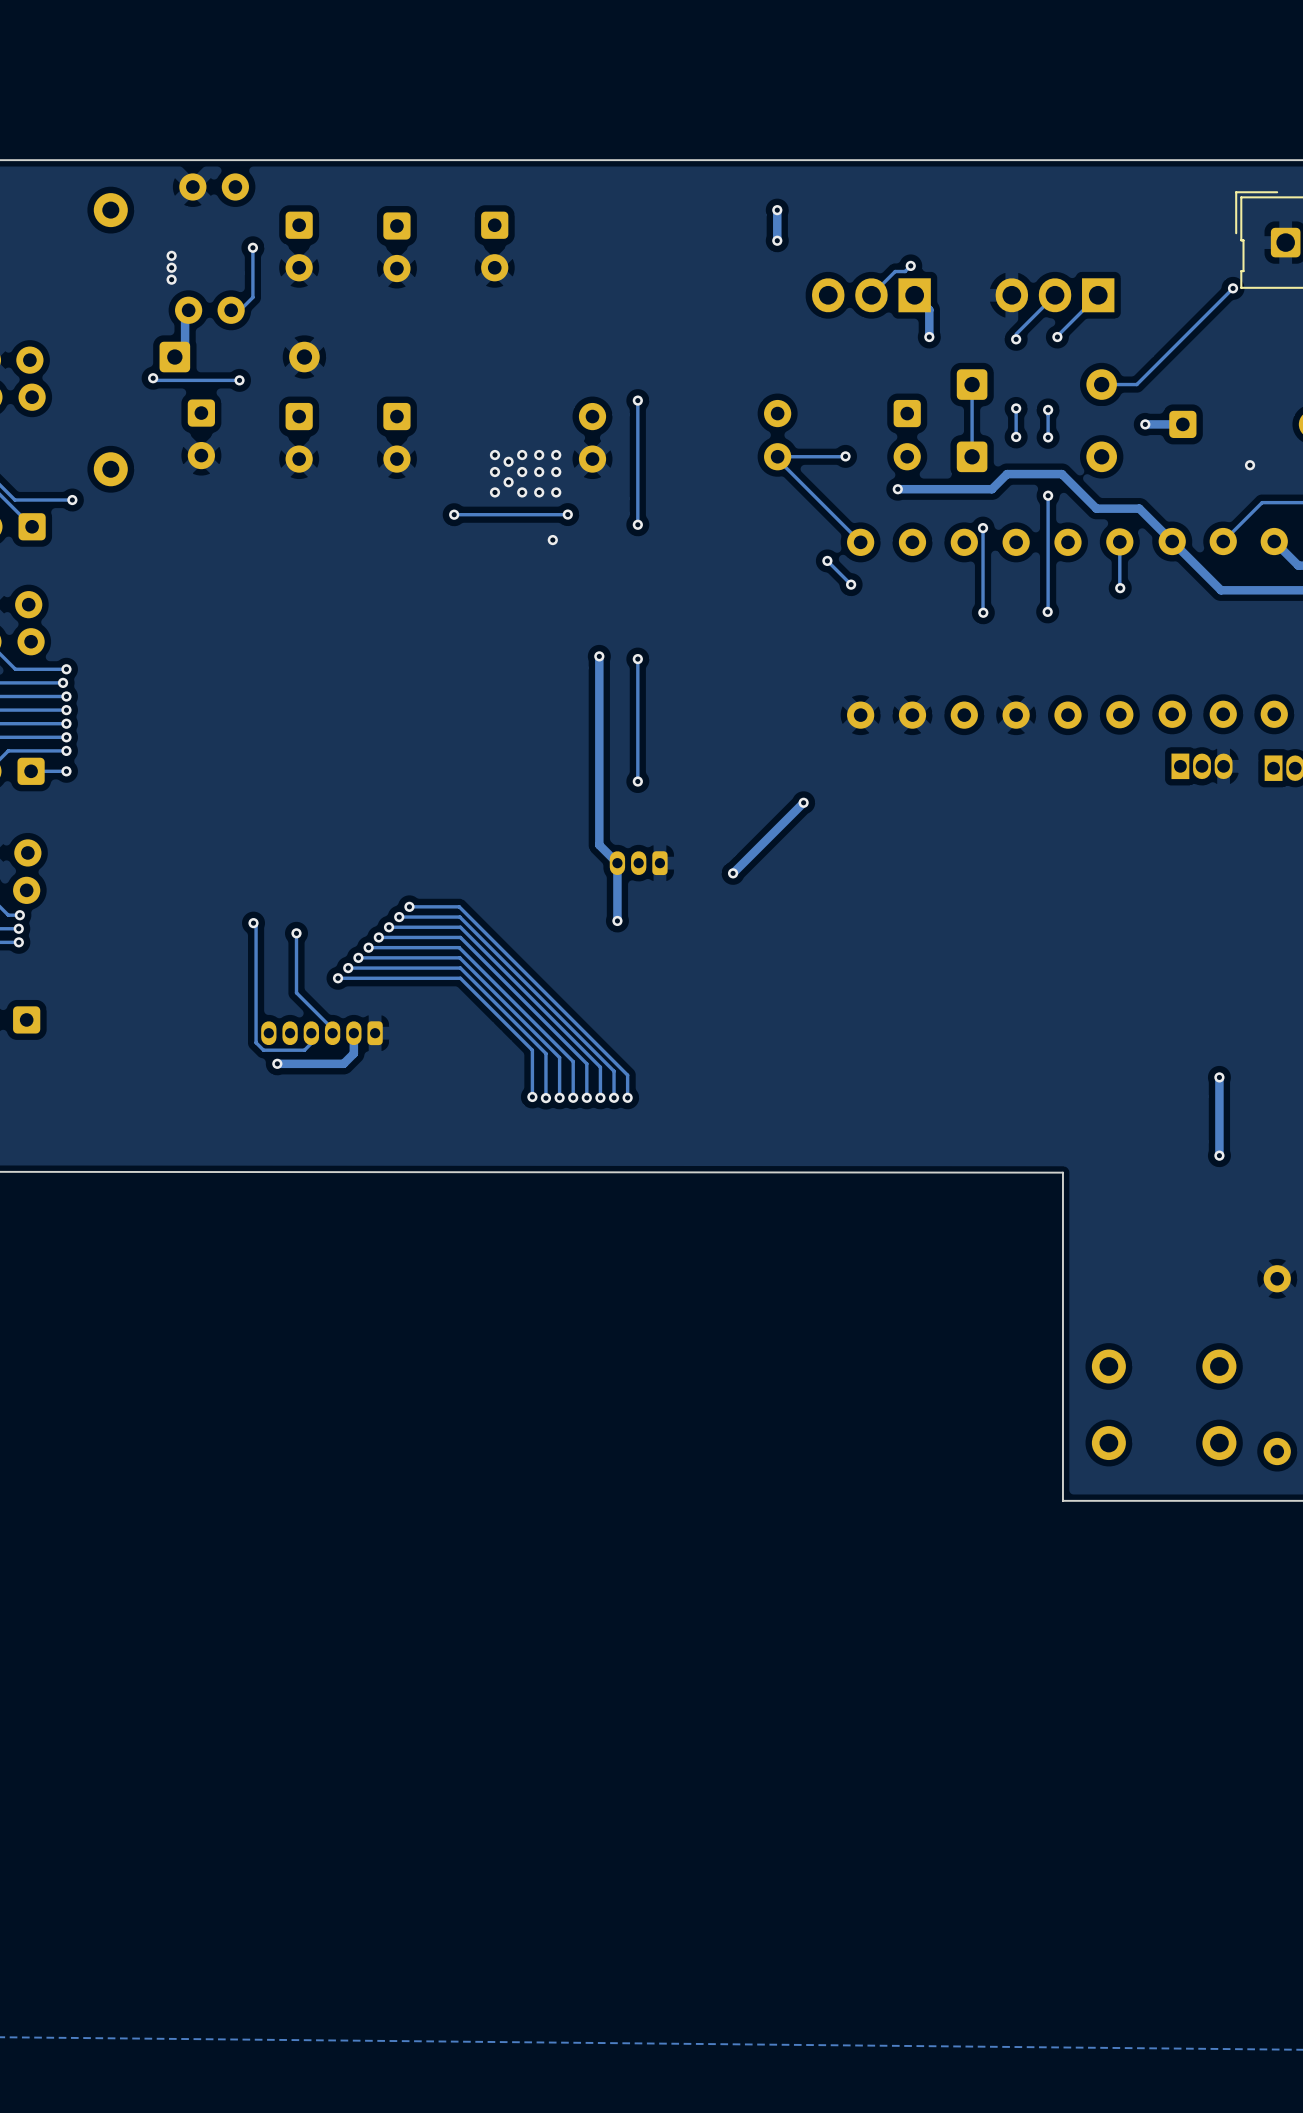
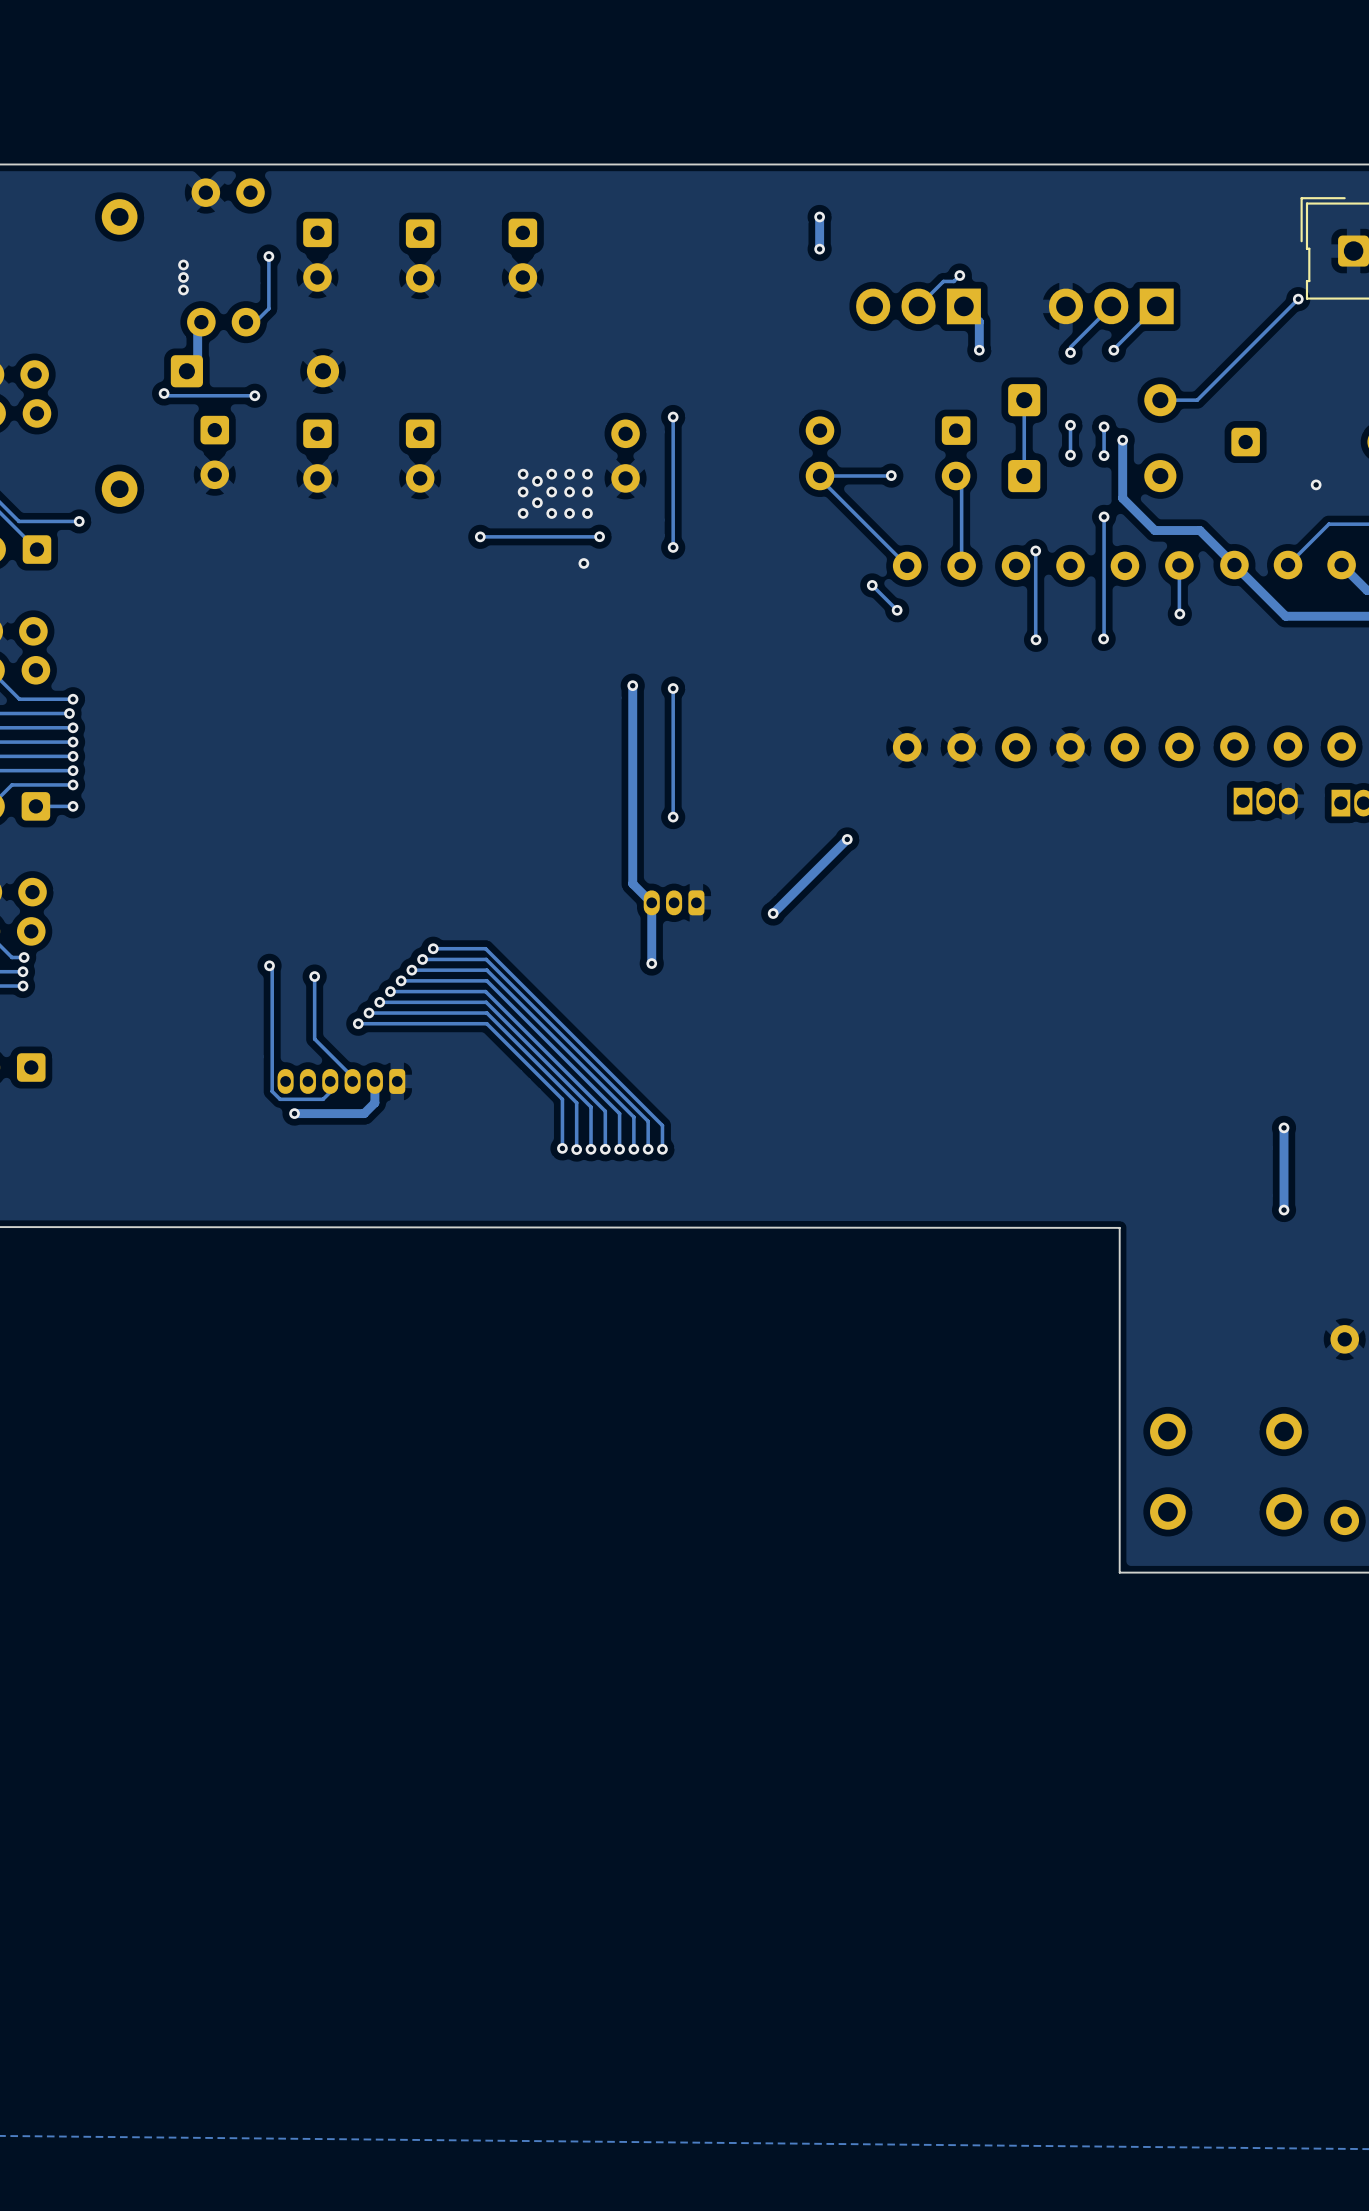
via position: (1145, 424) -> (1122, 440)
track: (1182, 424) (1145, 424) -> none
track: none -> (961, 481) (961, 565)
track: (1065, 477) (1061, 474) (1007, 474) (991, 489) (897, 489) -> (1122, 498) (1122, 440)
via: (897, 489) -> none

